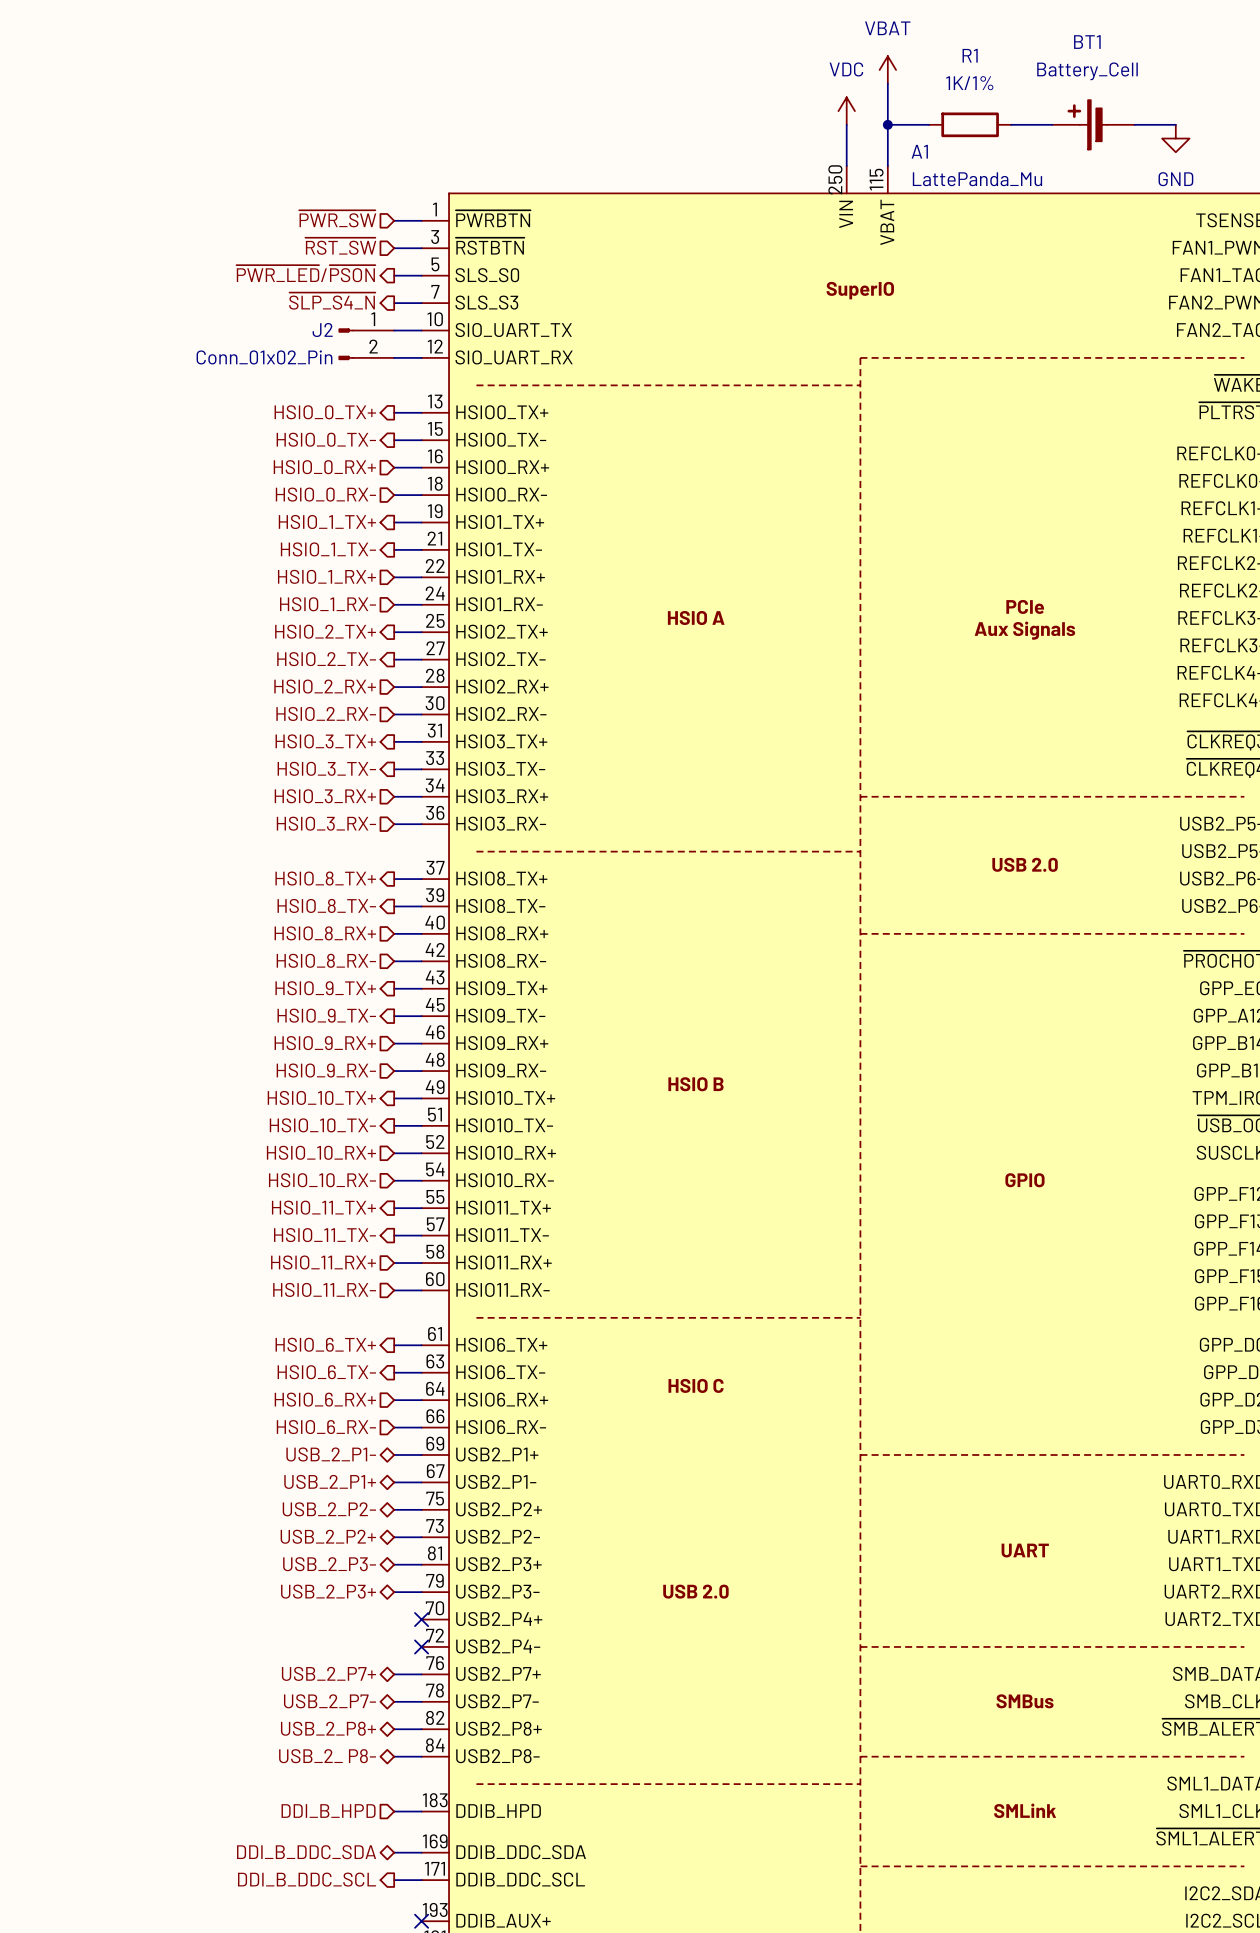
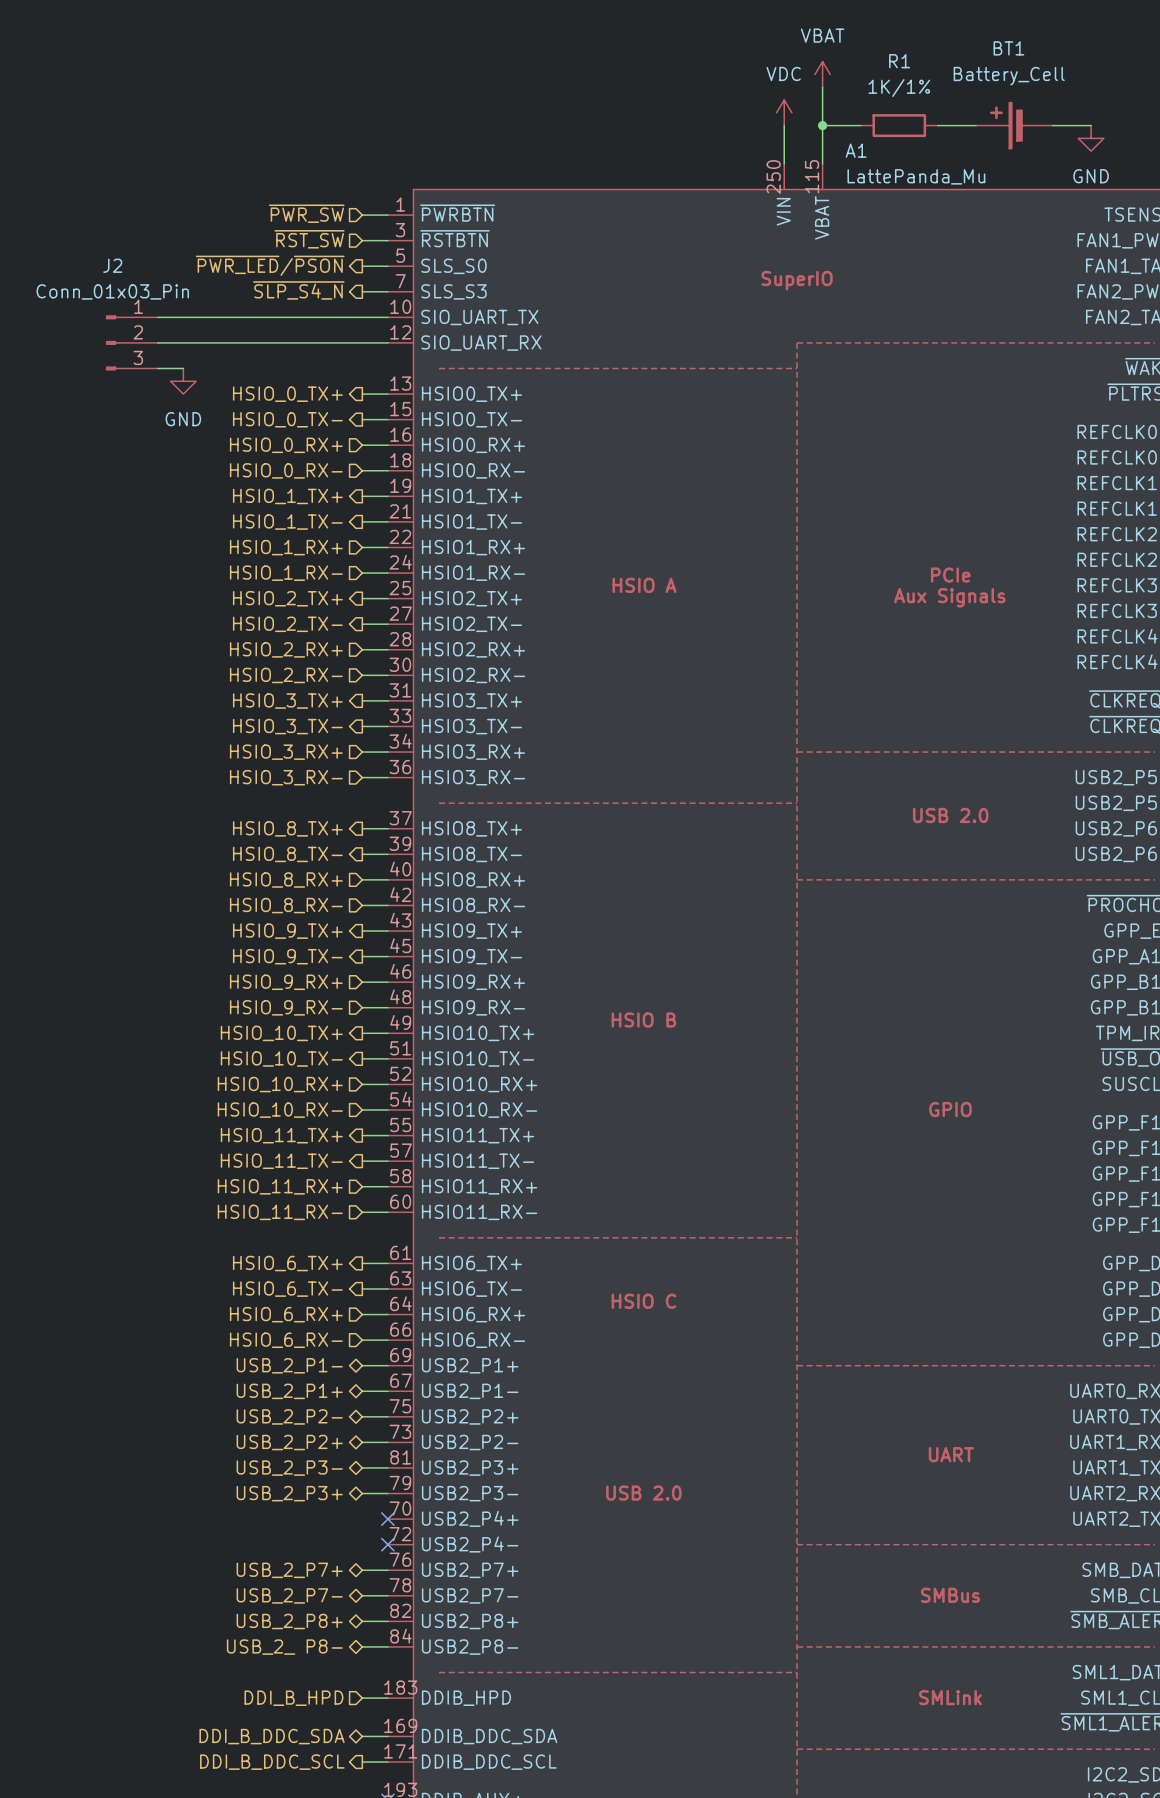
J2 symbol: [338, 328, 395, 361] -> [105, 315, 158, 371]
wire: none -> (157, 317) (362, 317)
J2 name position: J2 (322, 330) -> J2 (112, 265)
wire: none -> (157, 342) (362, 342)
J2 value: Conn_01x02_Pin (264, 357) -> Conn_01x03_Pin (112, 291)
wire: none -> (157, 368) (183, 368)
power symbol: none -> GND (183, 381)

